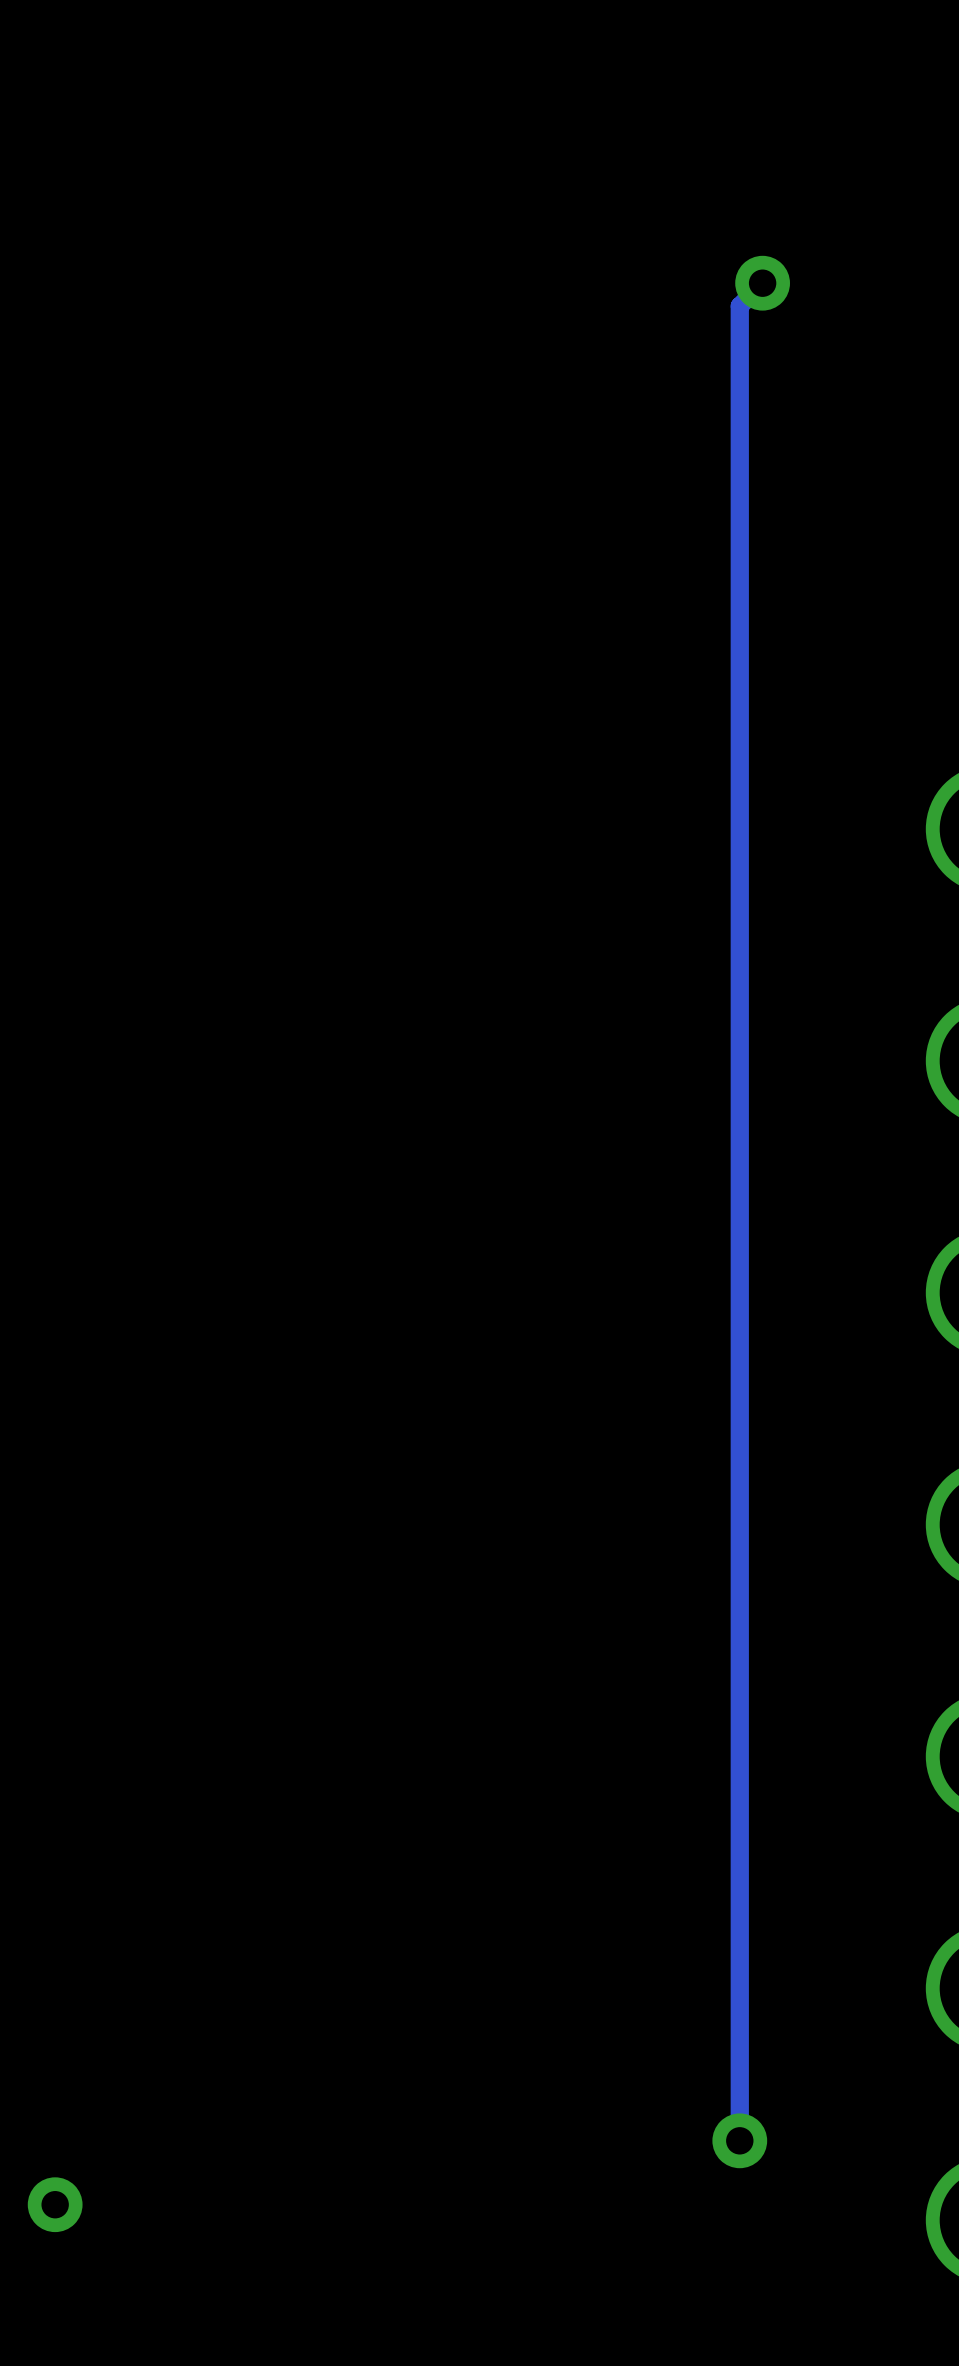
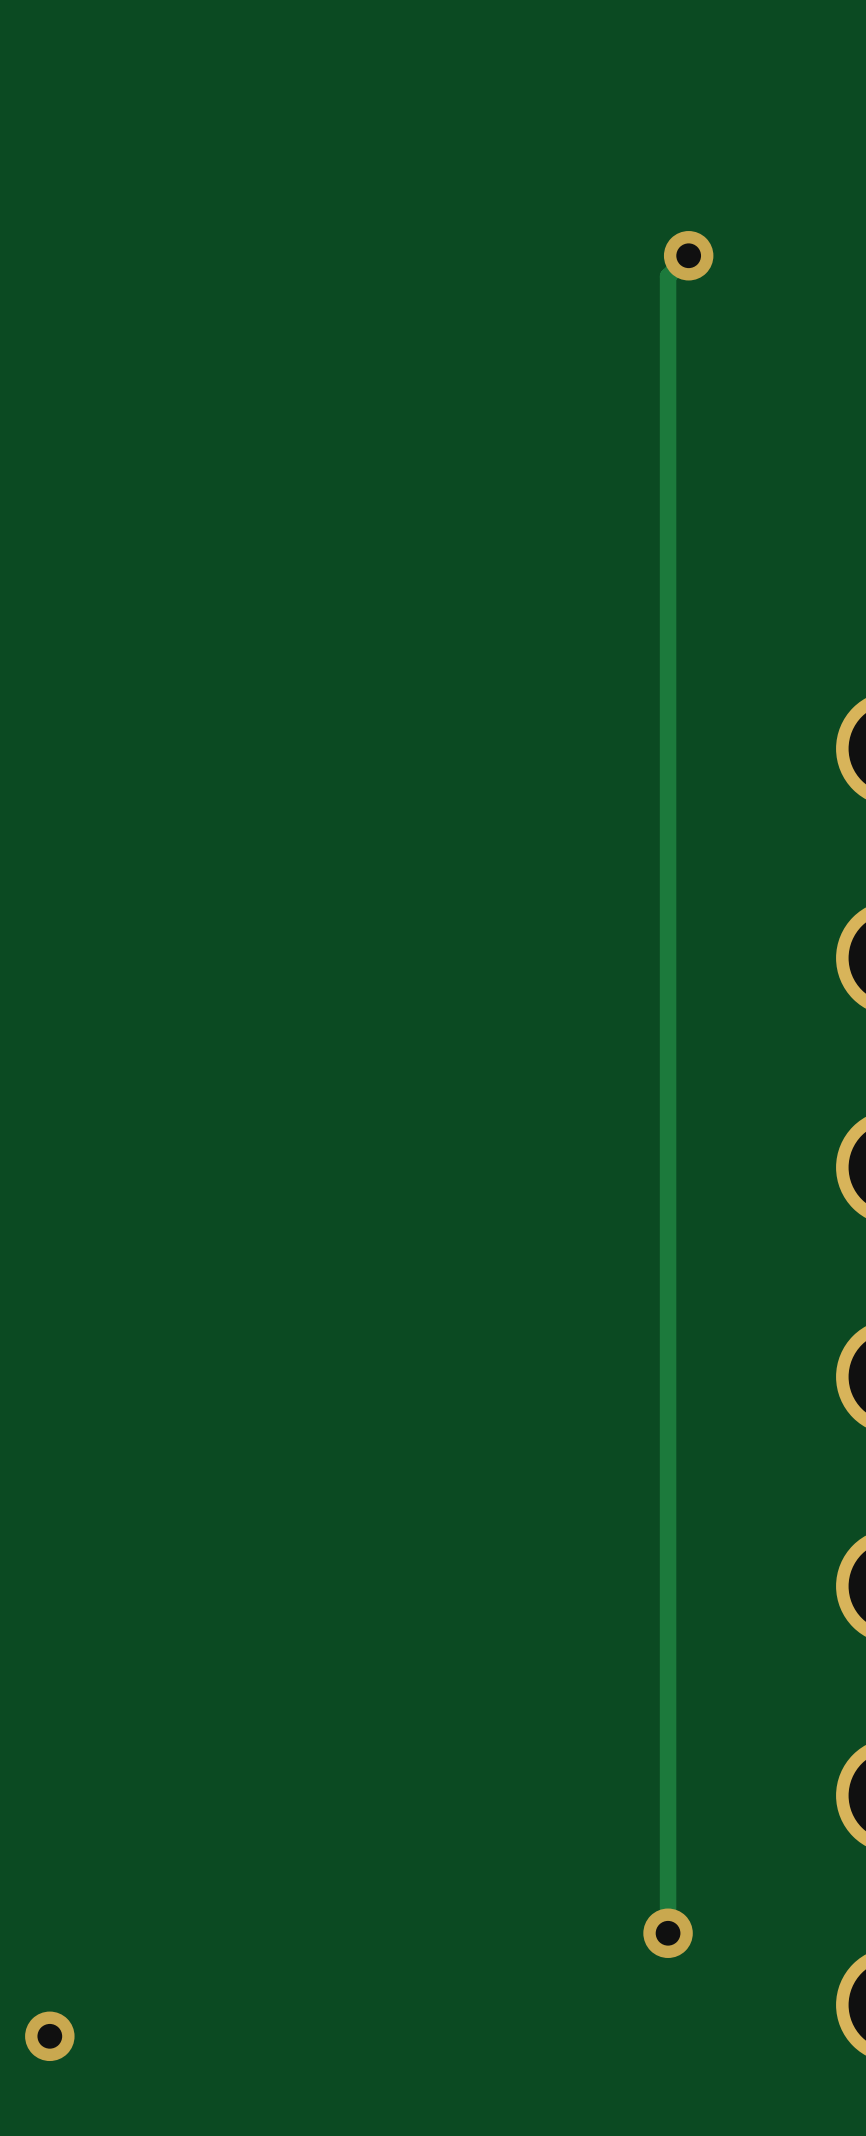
via position: (55, 2204) -> (49, 2036)

